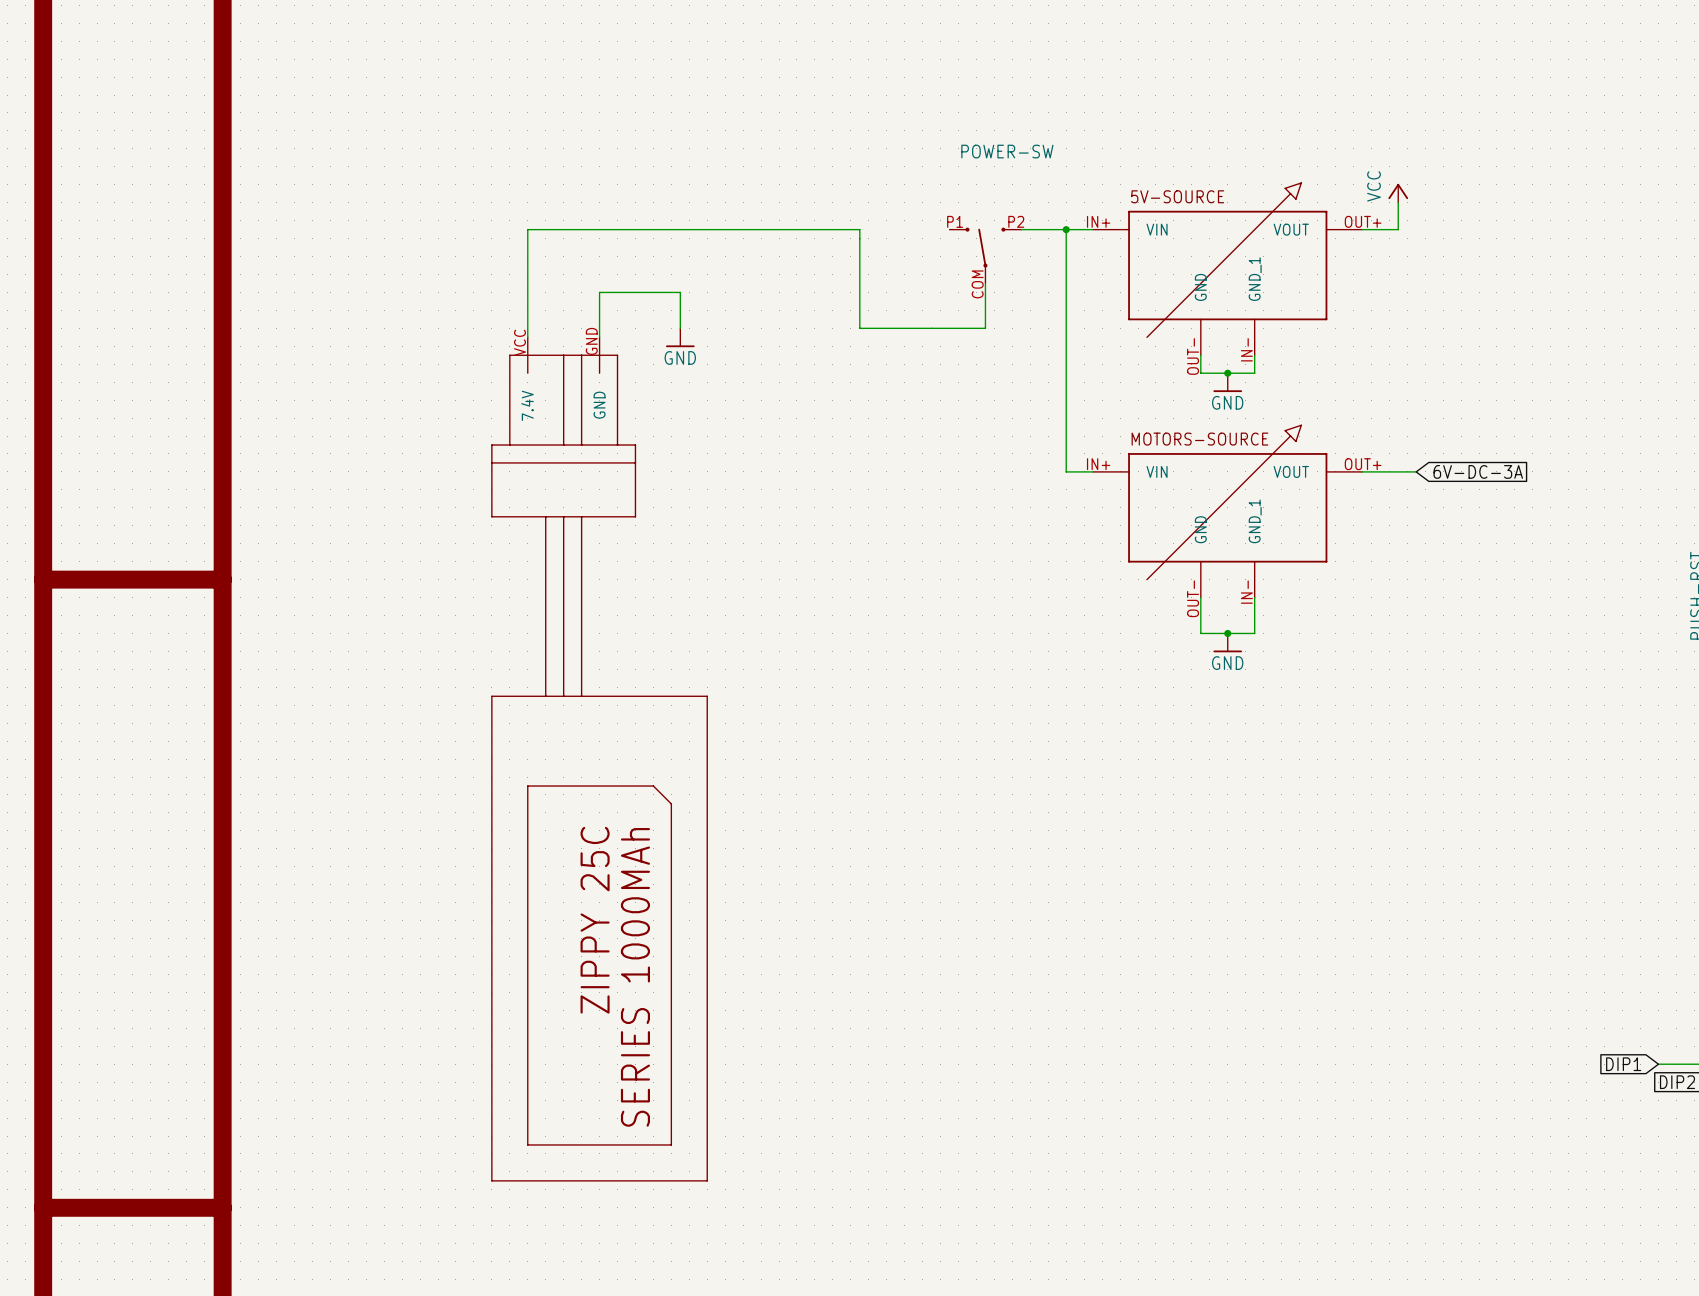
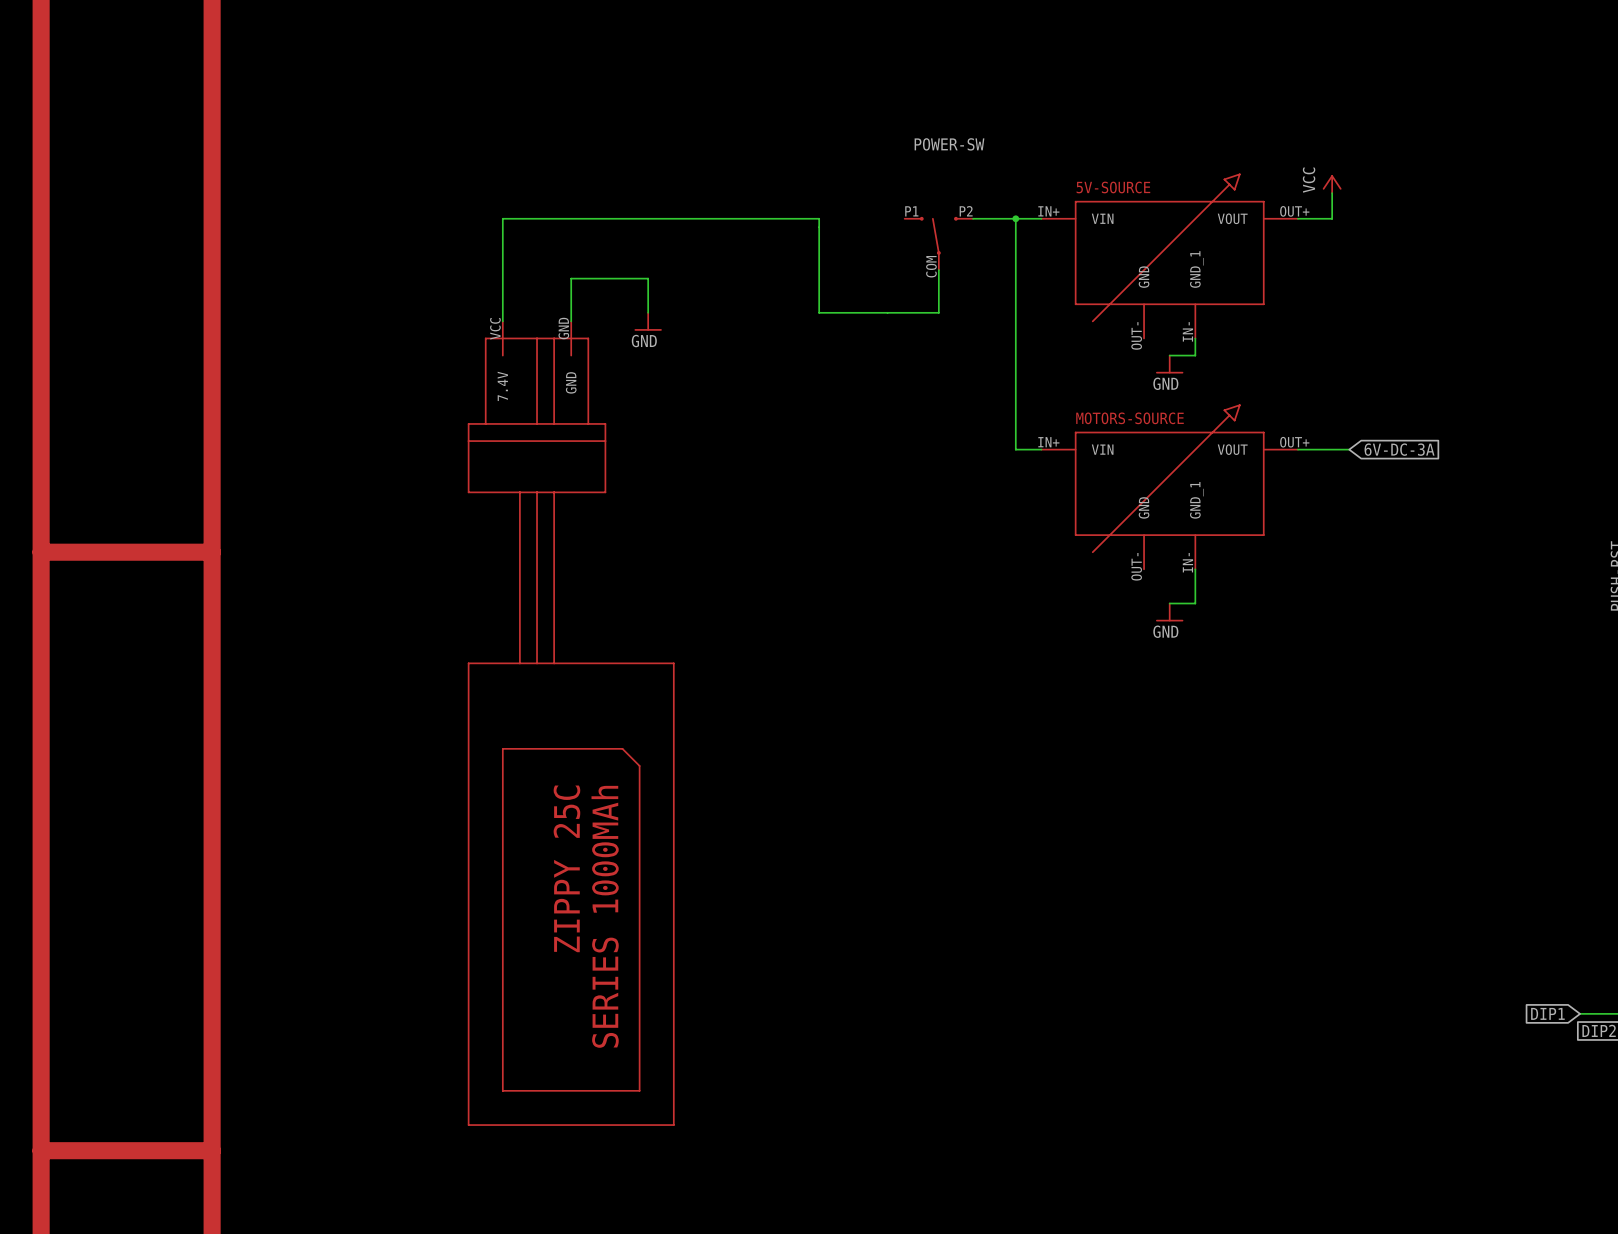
wire: (1200, 355) (1200, 373) (1227, 373) -> none
junction: (1227, 373) -> none
wire: (1200, 597) (1200, 633) (1227, 633) -> none
junction: (1227, 633) -> none

